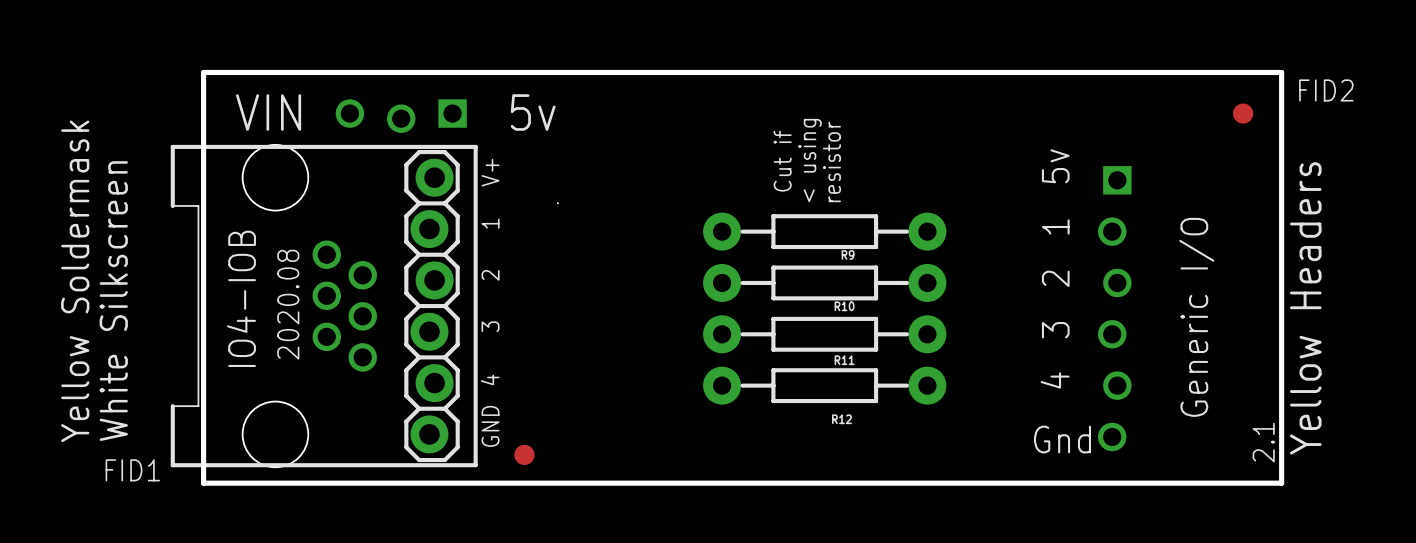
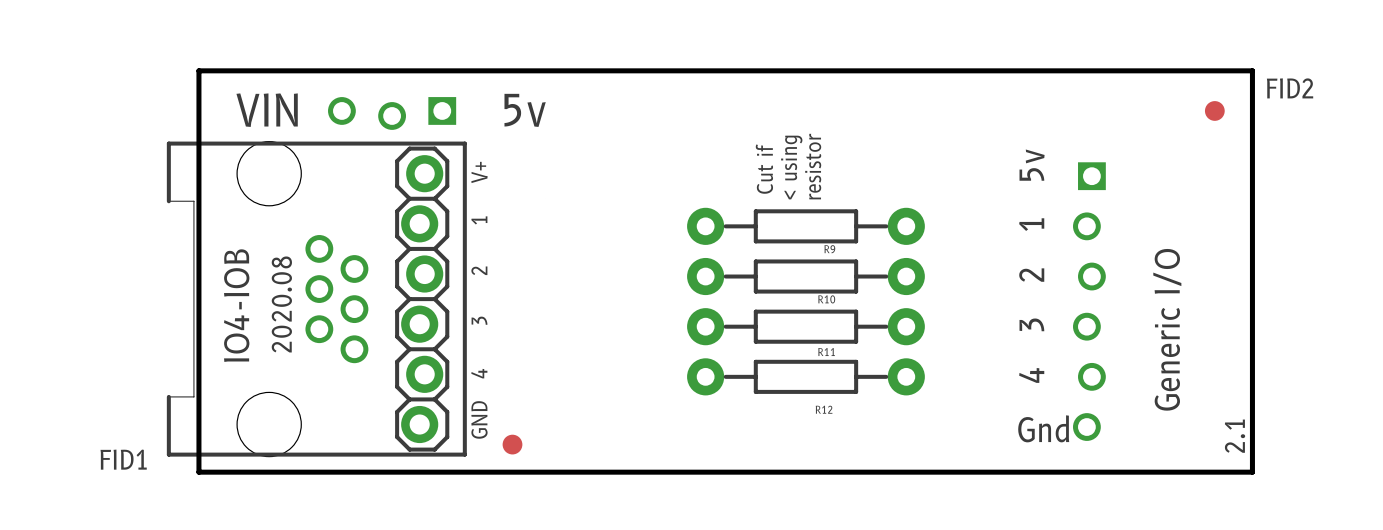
text: Yellow Soldermask (75, 281) -> none
text: White Silkscreen (113, 301) -> none
text: Yellow Headers (1305, 308) -> none

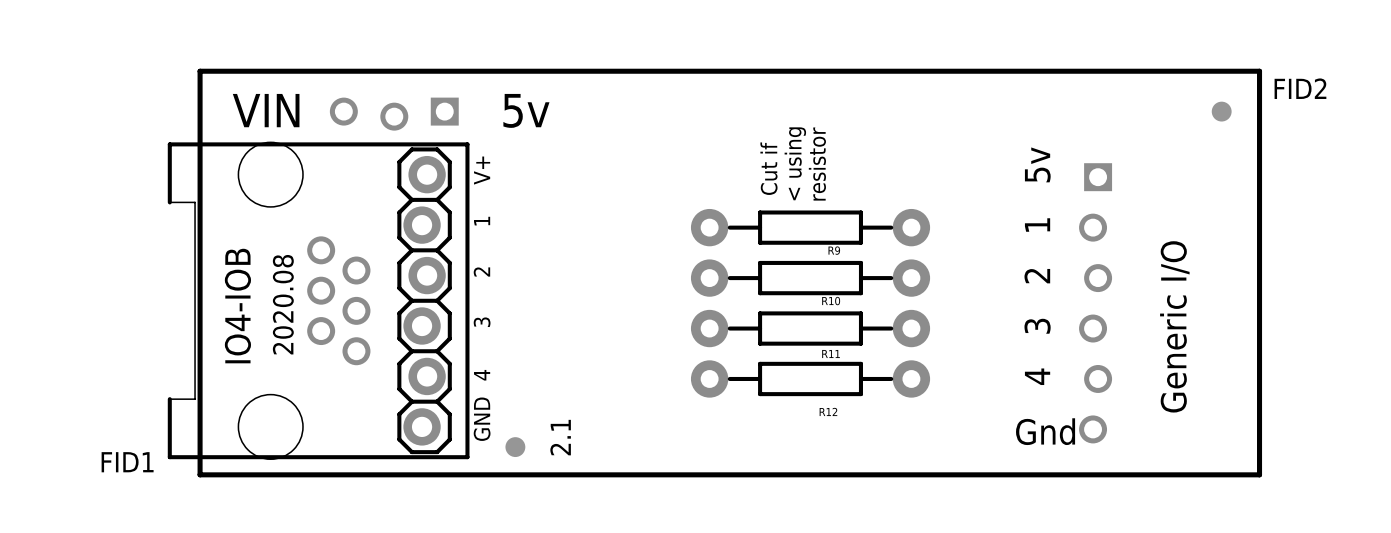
text: none -> 2.1 (560, 437)
text: 2.1 (1235, 436) -> none

